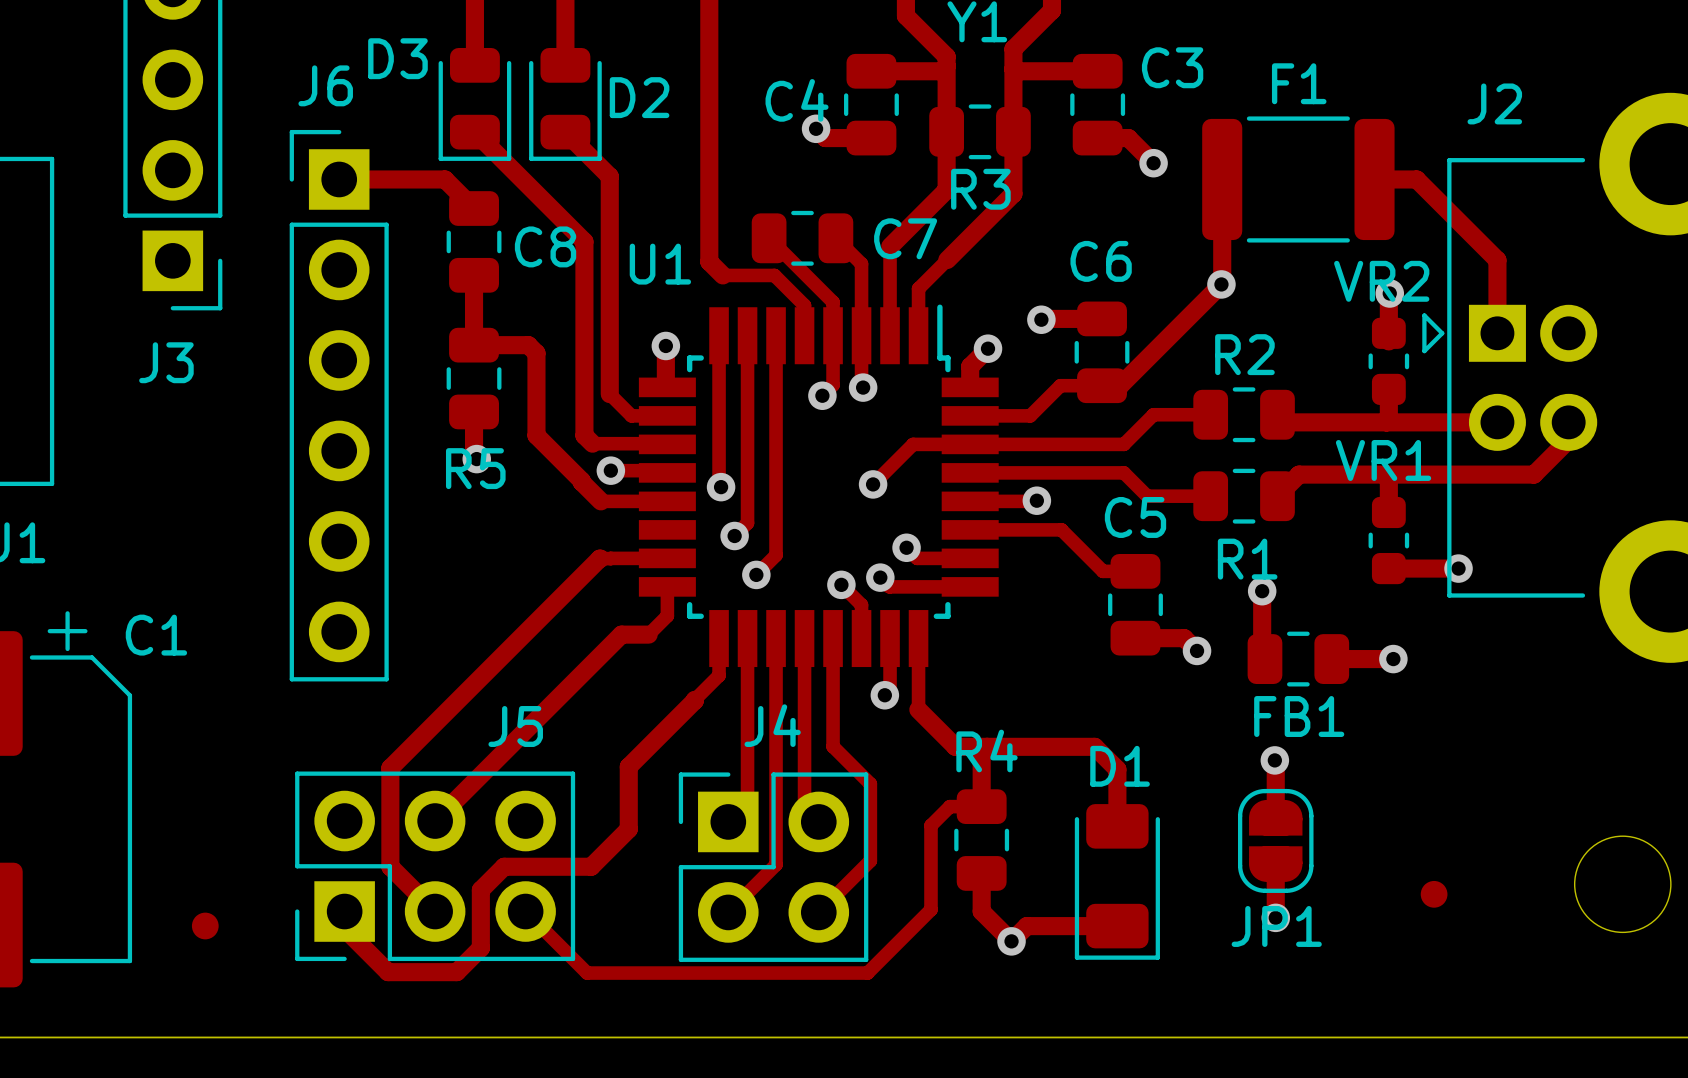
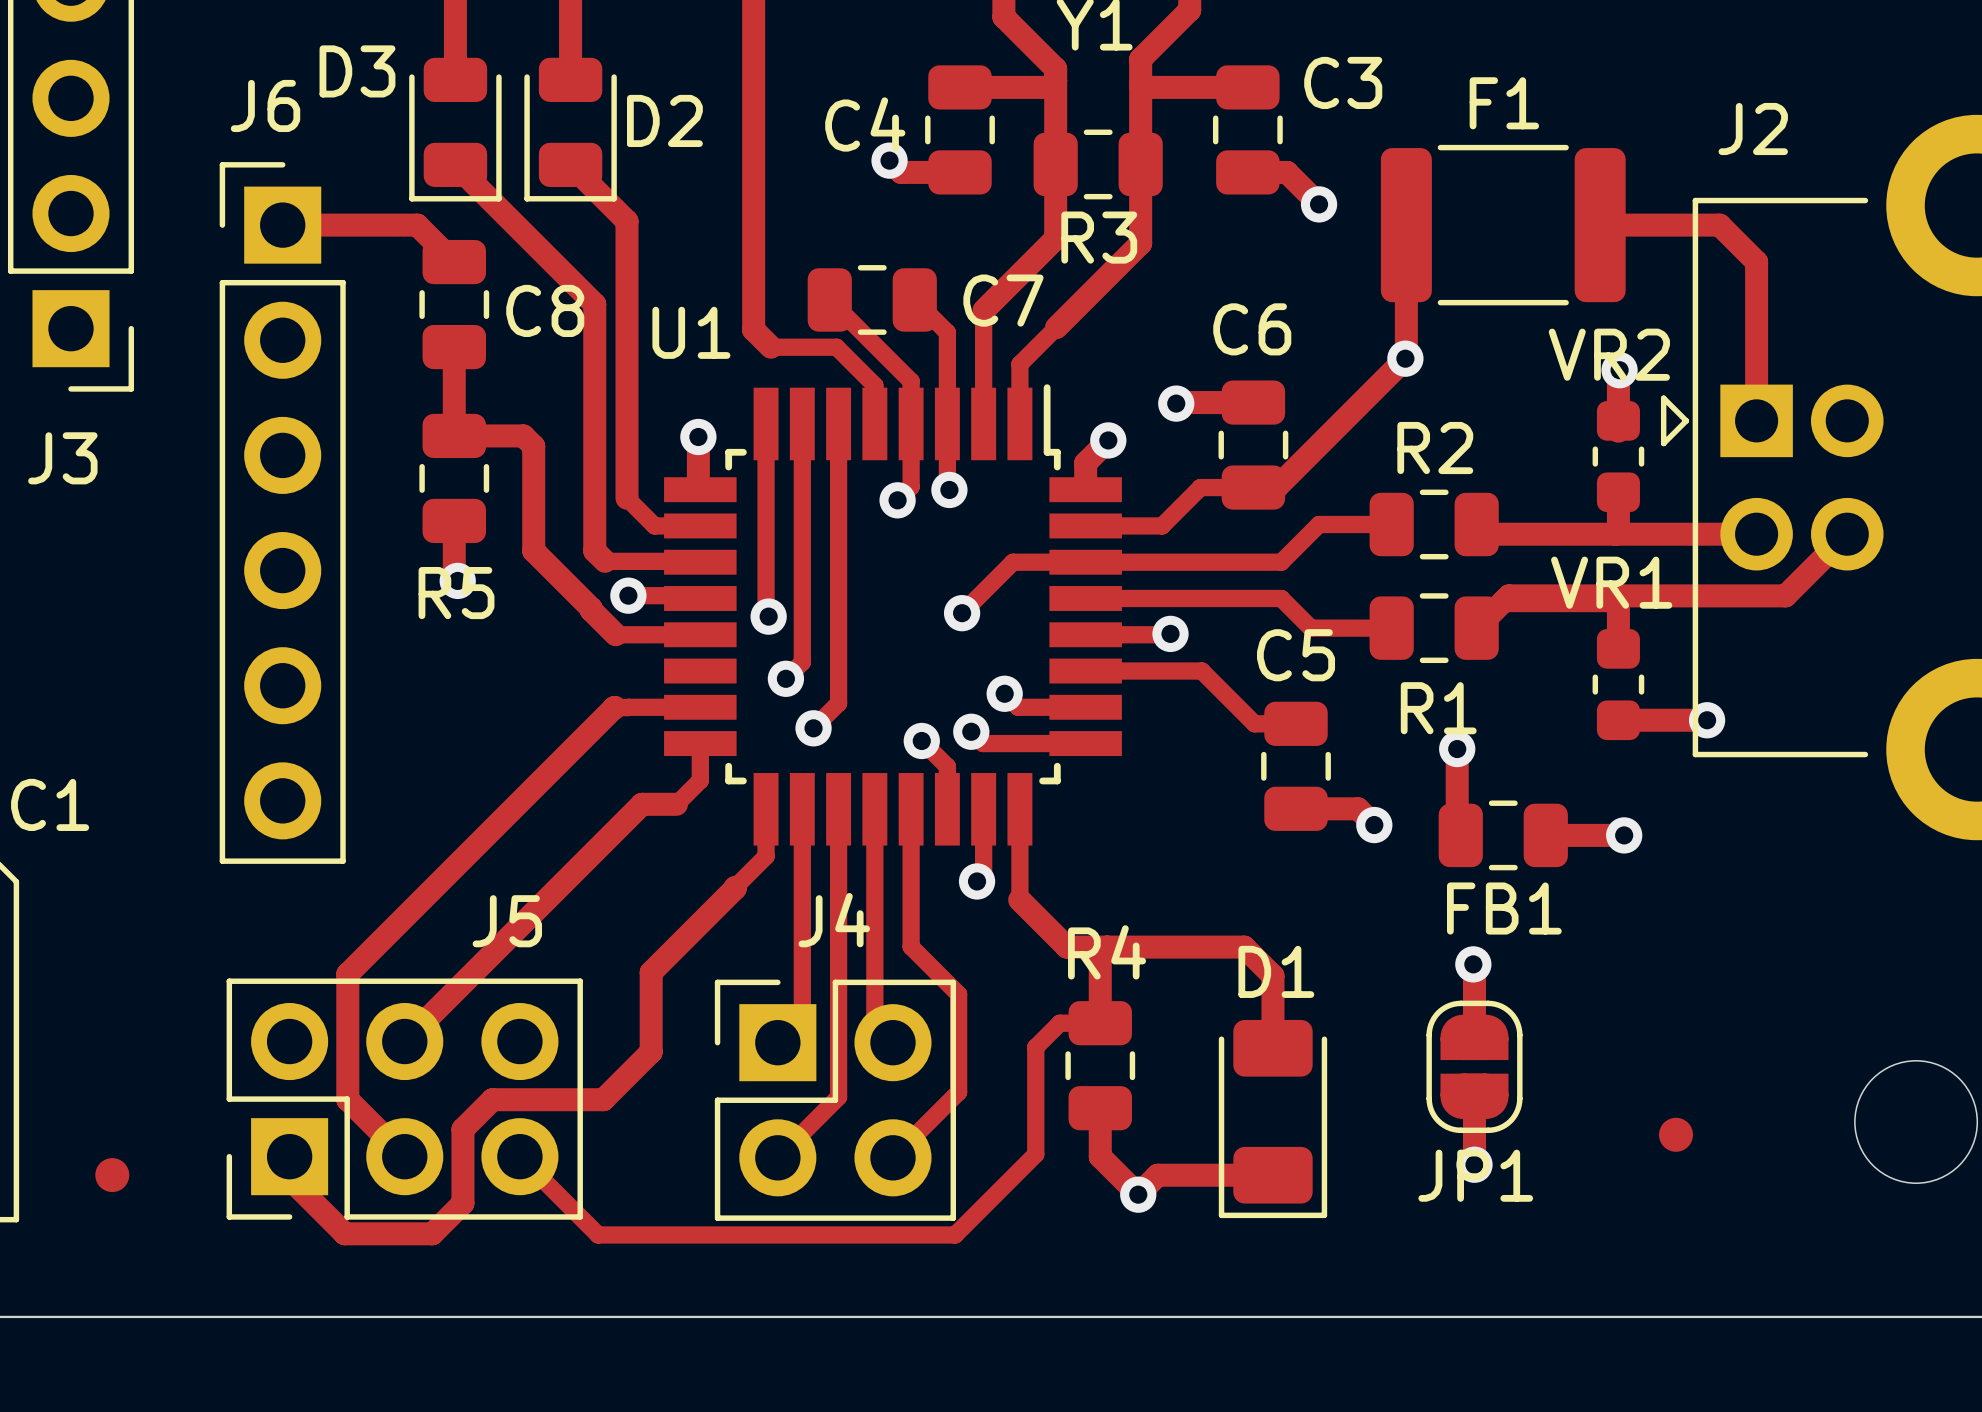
track: (1416, 179) (1497, 260) -> (1653, 225) (1719, 225) (1756, 261) (1756, 327)
track: (1568, 422) (1568, 439) (1533, 474) (1388, 474) -> (1847, 534) (1785, 595) (1508, 595) (1504, 600)

